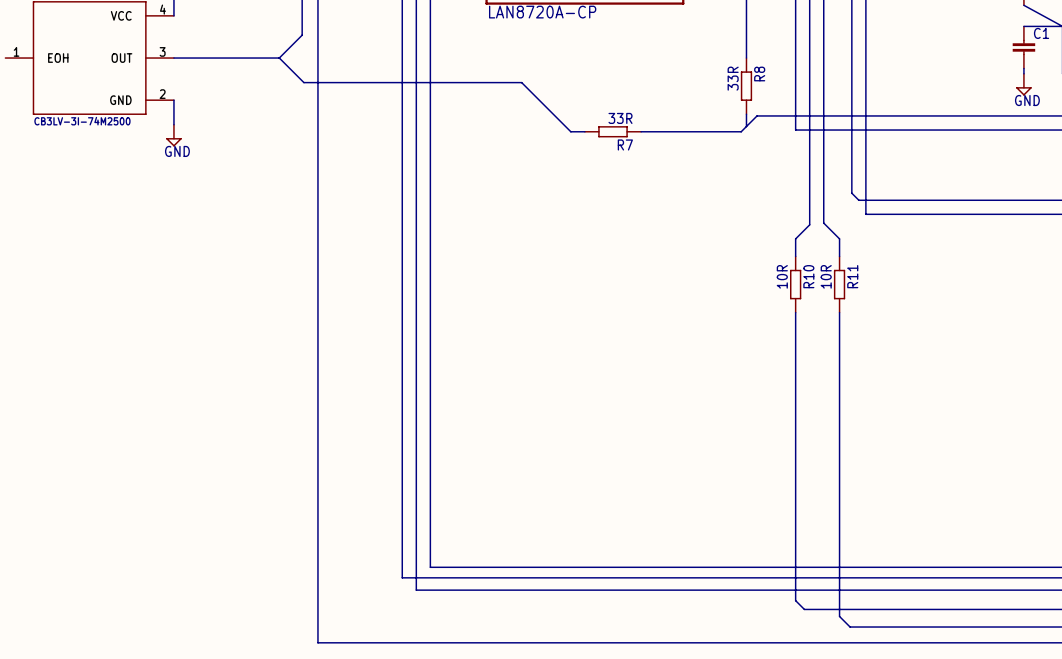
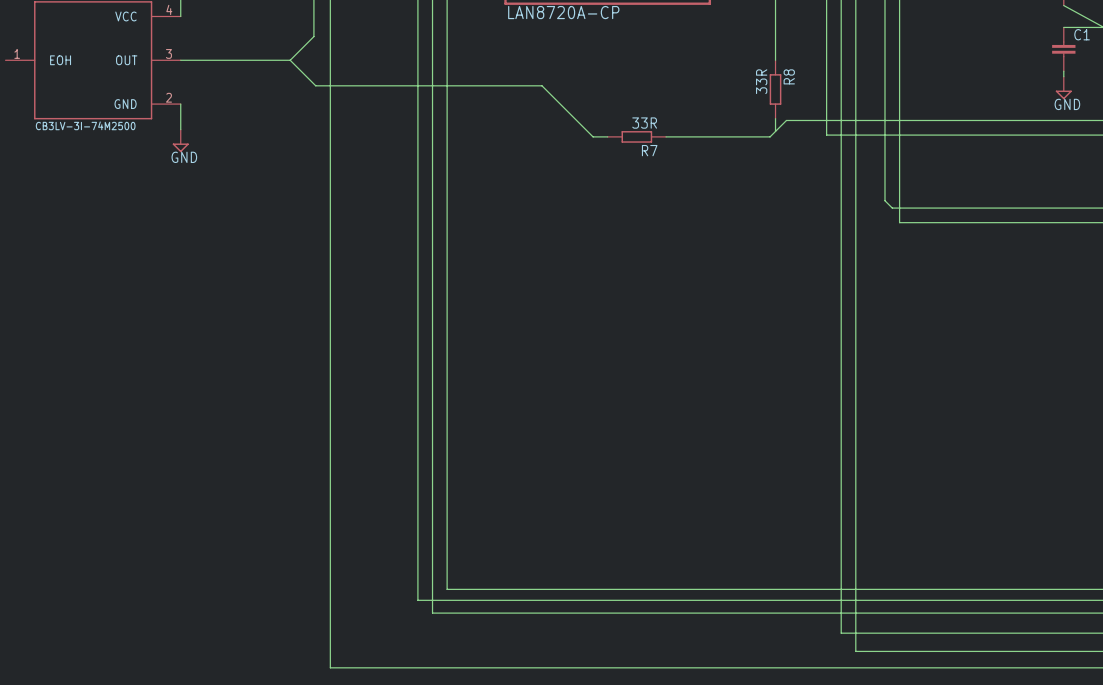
wire: (823, 223) (839, 238) (839, 256) -> none
wire: (809, 224) (795, 238) (795, 256) -> none
R10: 10R (795, 284) -> none
R11: 10R (839, 284) -> none
wire: (795, 312) (795, 600) (804, 609) (809, 609) -> (841, 233) (841, 633)
wire: (839, 312) (839, 616) (850, 627) -> (855, 231) (855, 651) (883, 651)

